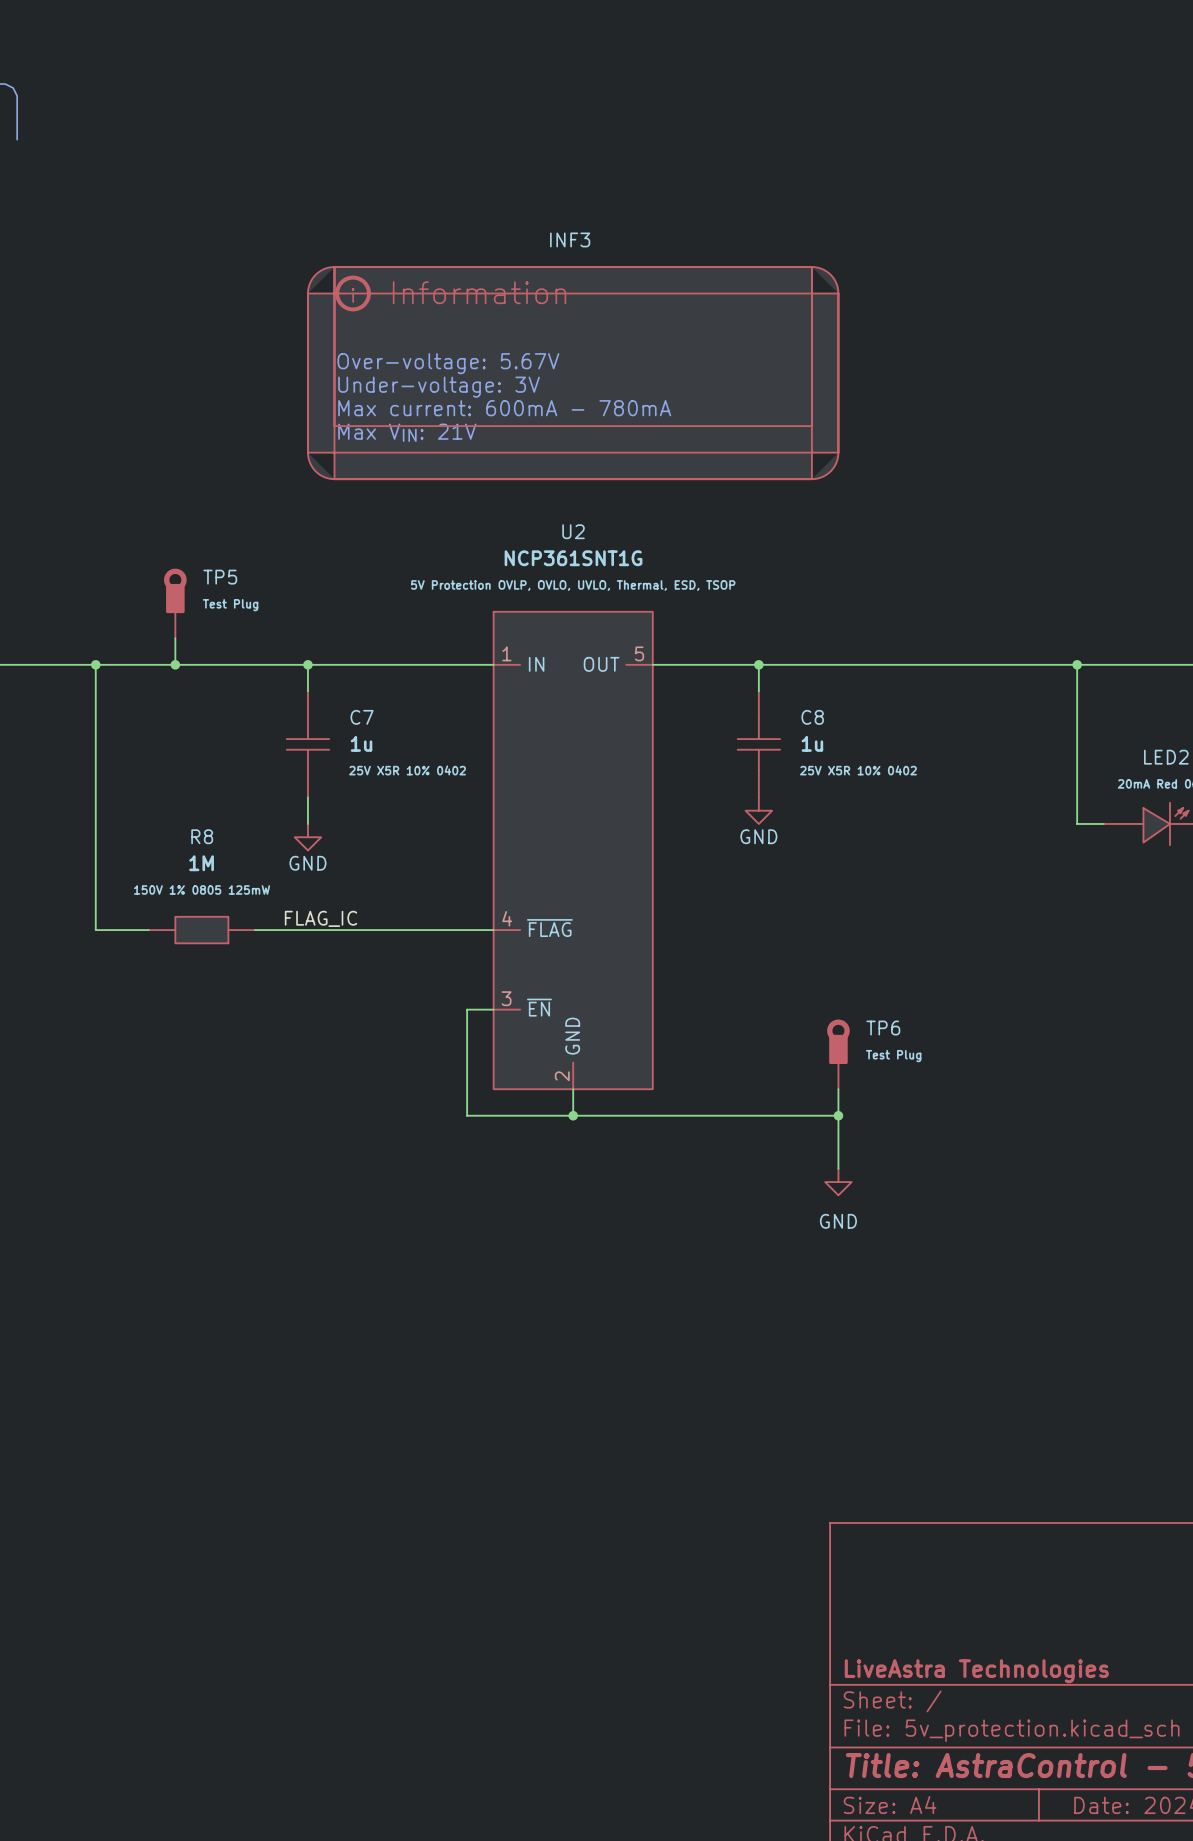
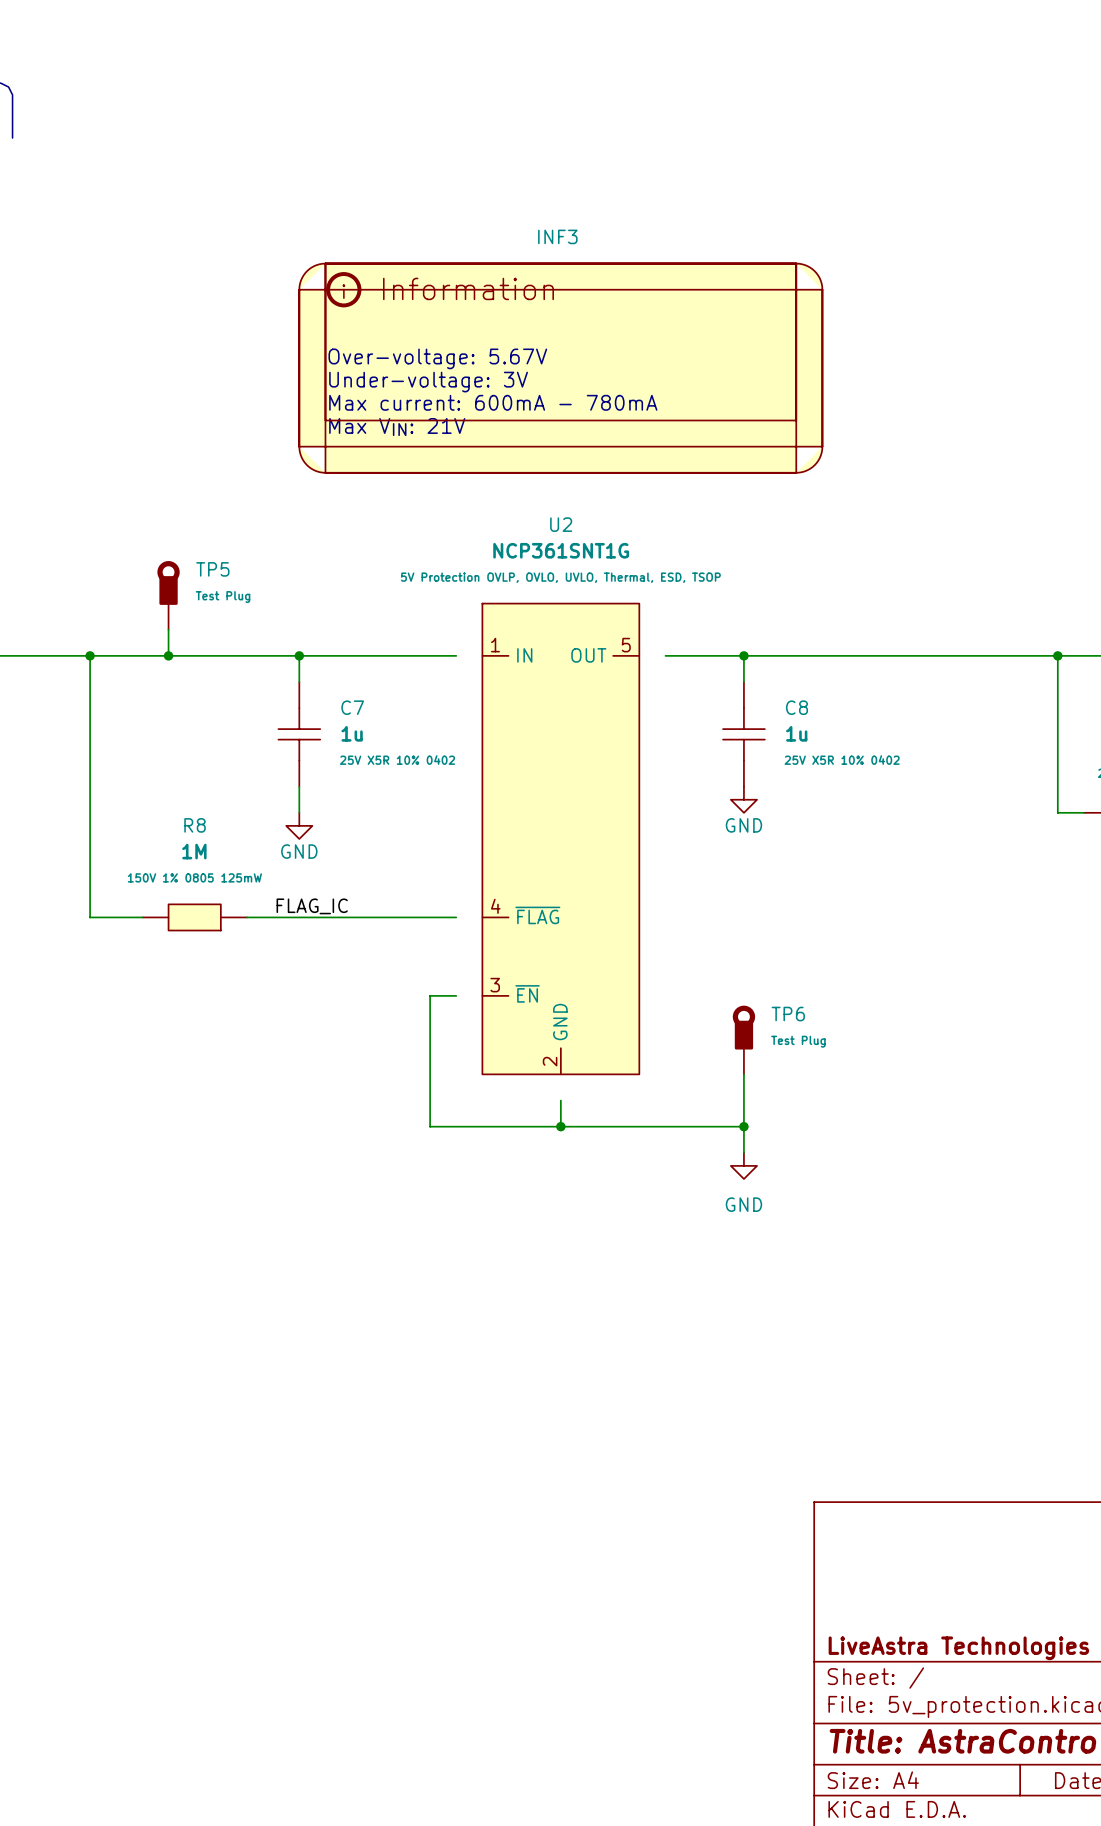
wire: (467, 664) (493, 664) -> none
wire: (652, 664) (679, 664) -> none
wire: (467, 930) (493, 930) -> none
wire: none -> (456, 995) (430, 995) (430, 1126) (743, 1126)
wire: (493, 1009) (467, 1009) (467, 1115) (838, 1115) -> none
TP6 position: (838, 1054) -> (743, 1040)
wire: (573, 1089) (573, 1115) -> (560, 1126) (560, 1100)
wire: (838, 1089) (838, 1168) -> (743, 1074) (743, 1152)
junction position: (573, 1115) -> (560, 1126)
junction: (838, 1115) -> none
junction: none -> (743, 1126)
power symbol position: GND (838, 1182) -> GND (743, 1165)

